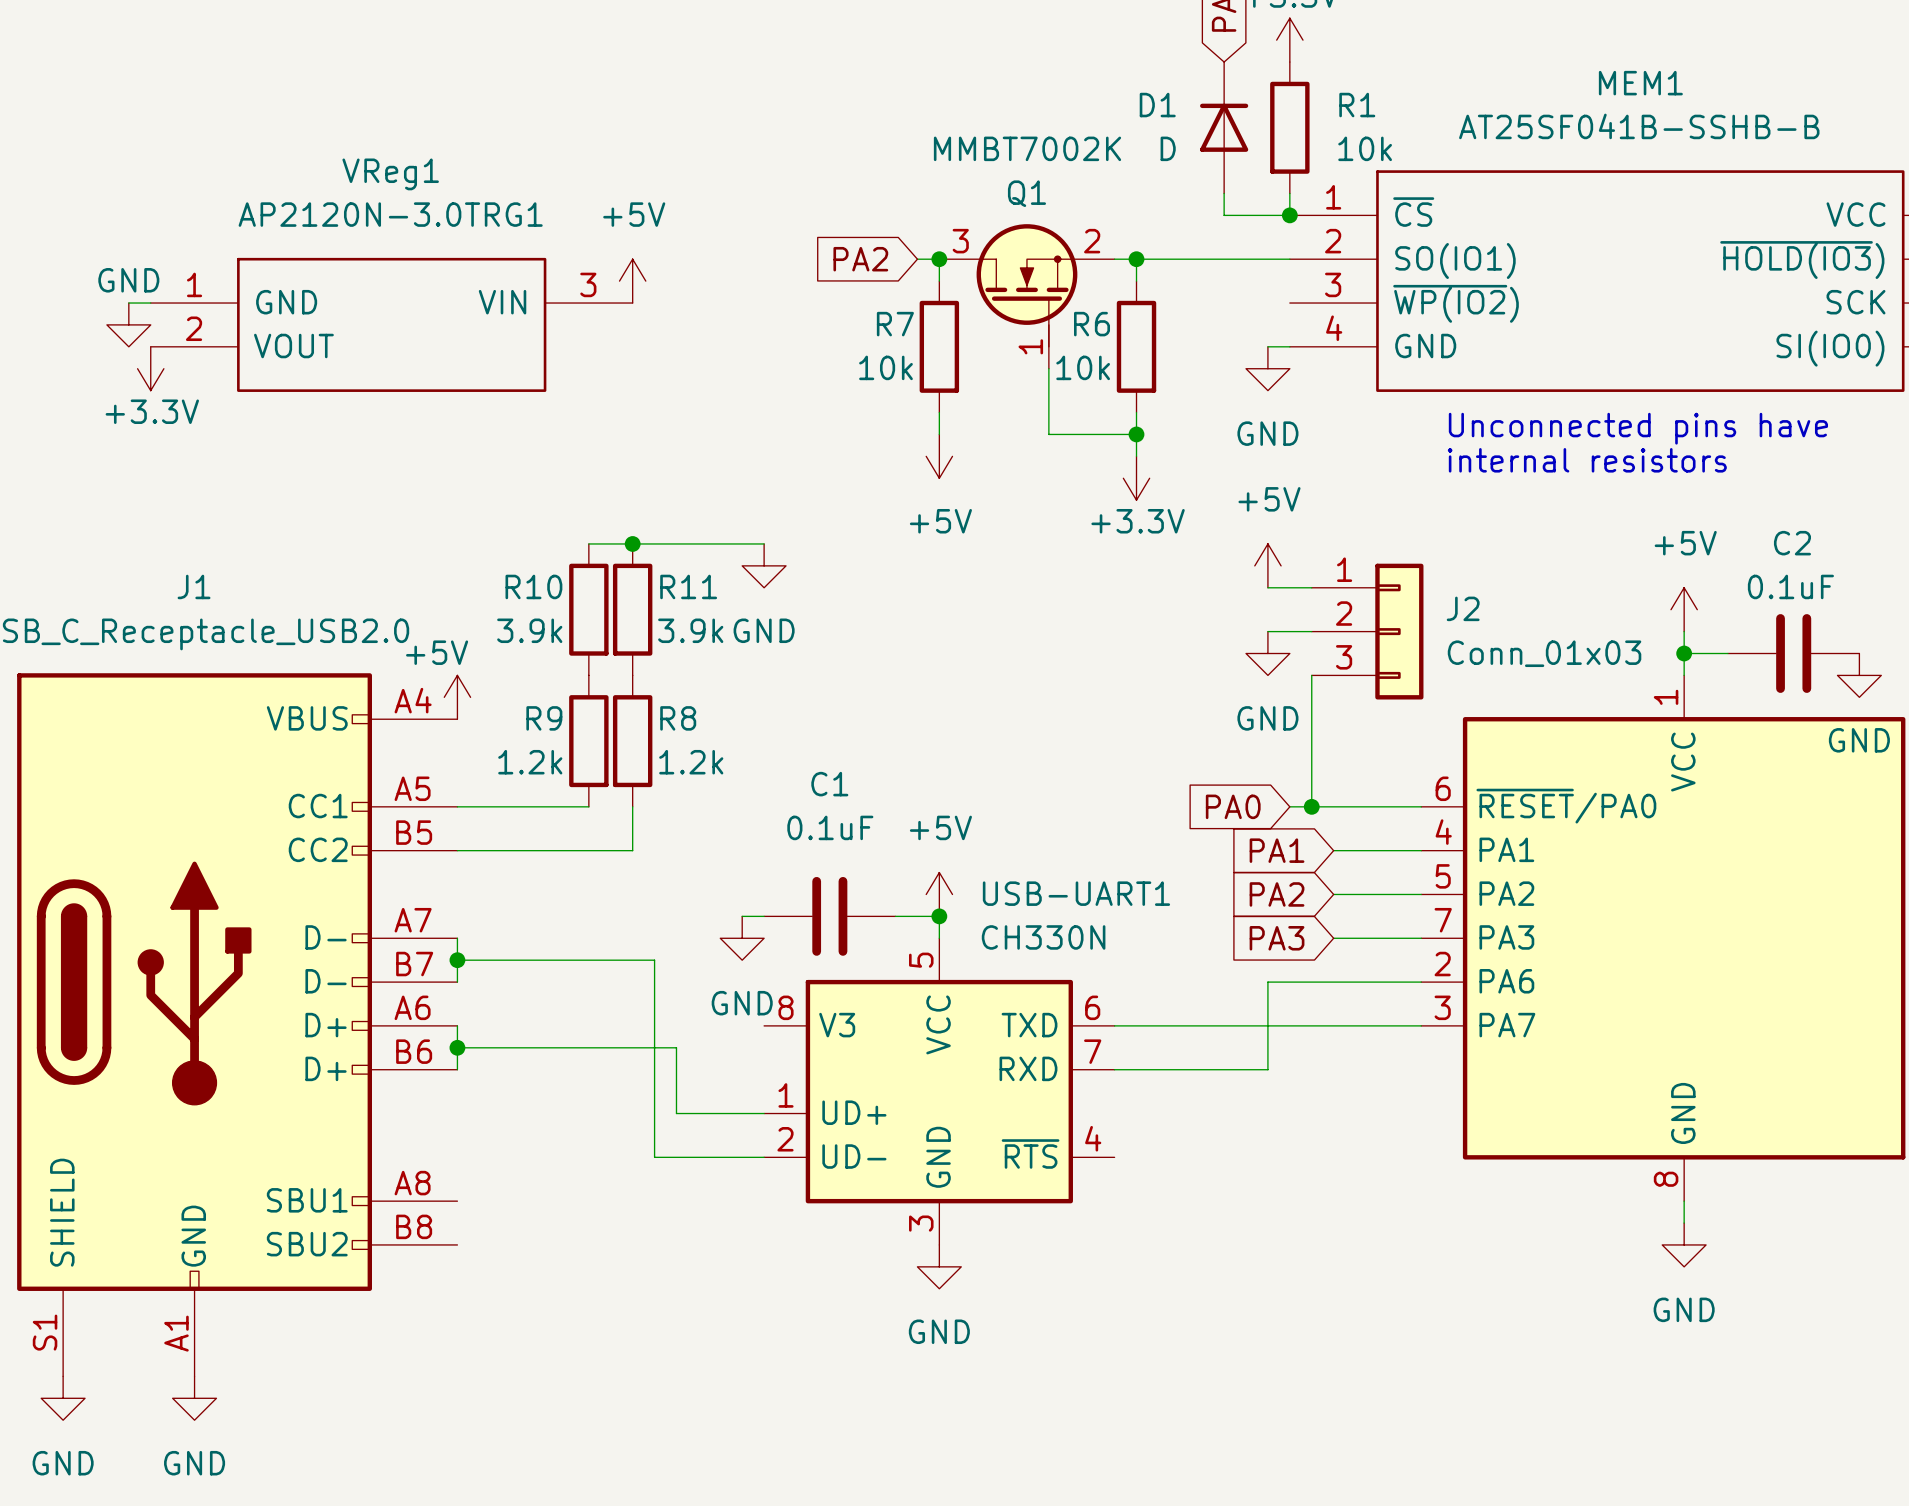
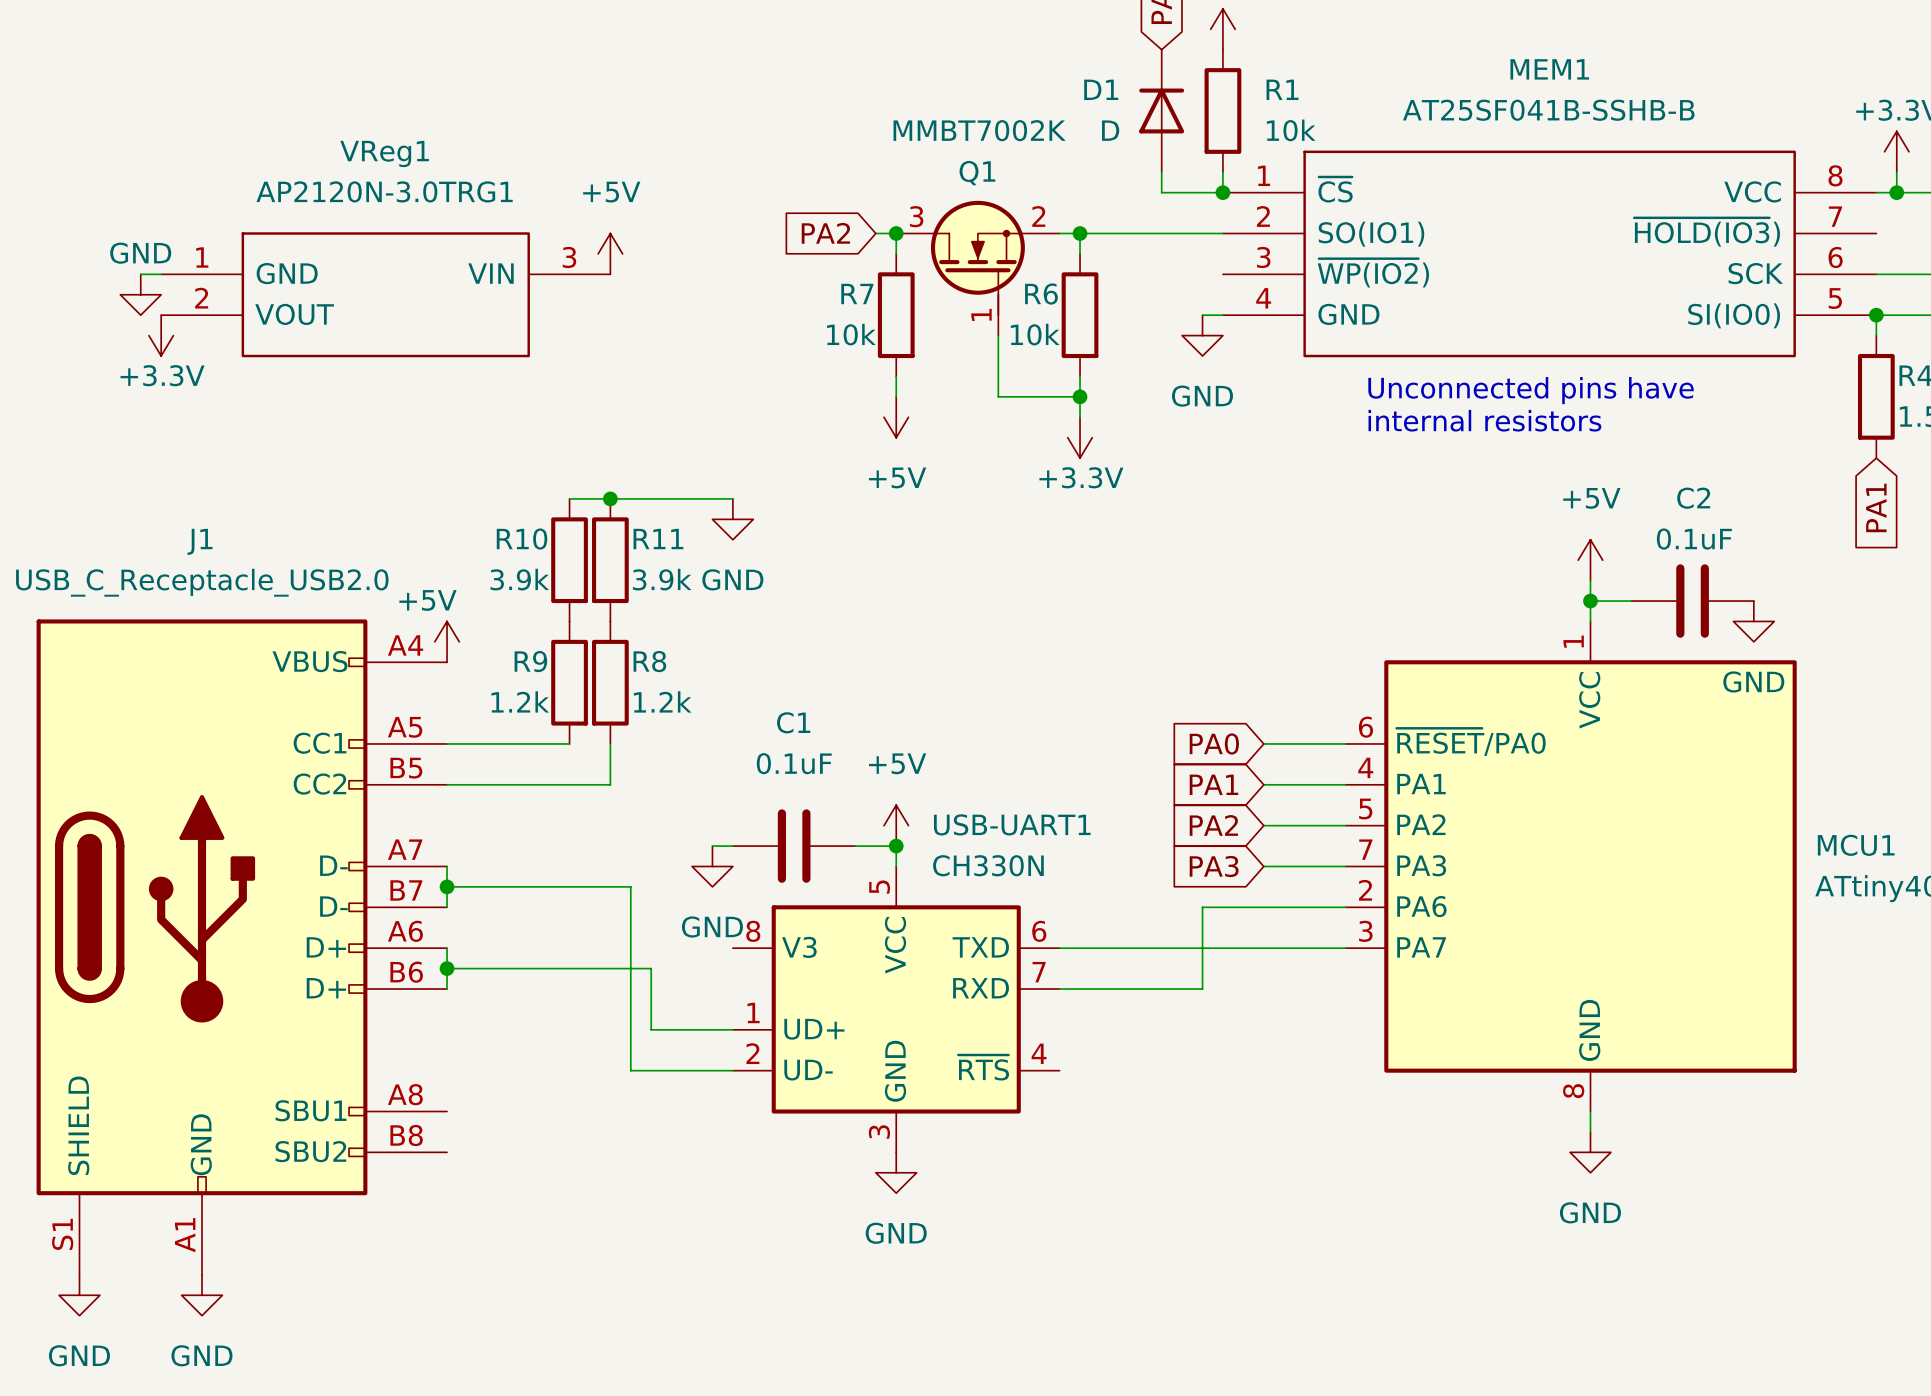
power symbol: +5V (1267, 565) -> none
wire: (1267, 587) (1311, 587) -> none
wire: (1267, 631) (1311, 631) -> none
J2: Conn_01x03 (1367, 631) -> none
power symbol: GND (1267, 653) -> none
wire: (1311, 675) (1311, 806) -> none
global label position: PA0 (1233, 806) -> PA0 (1214, 743)
wire: (1289, 806) (1333, 806) -> none
junction: (1311, 806) -> none

